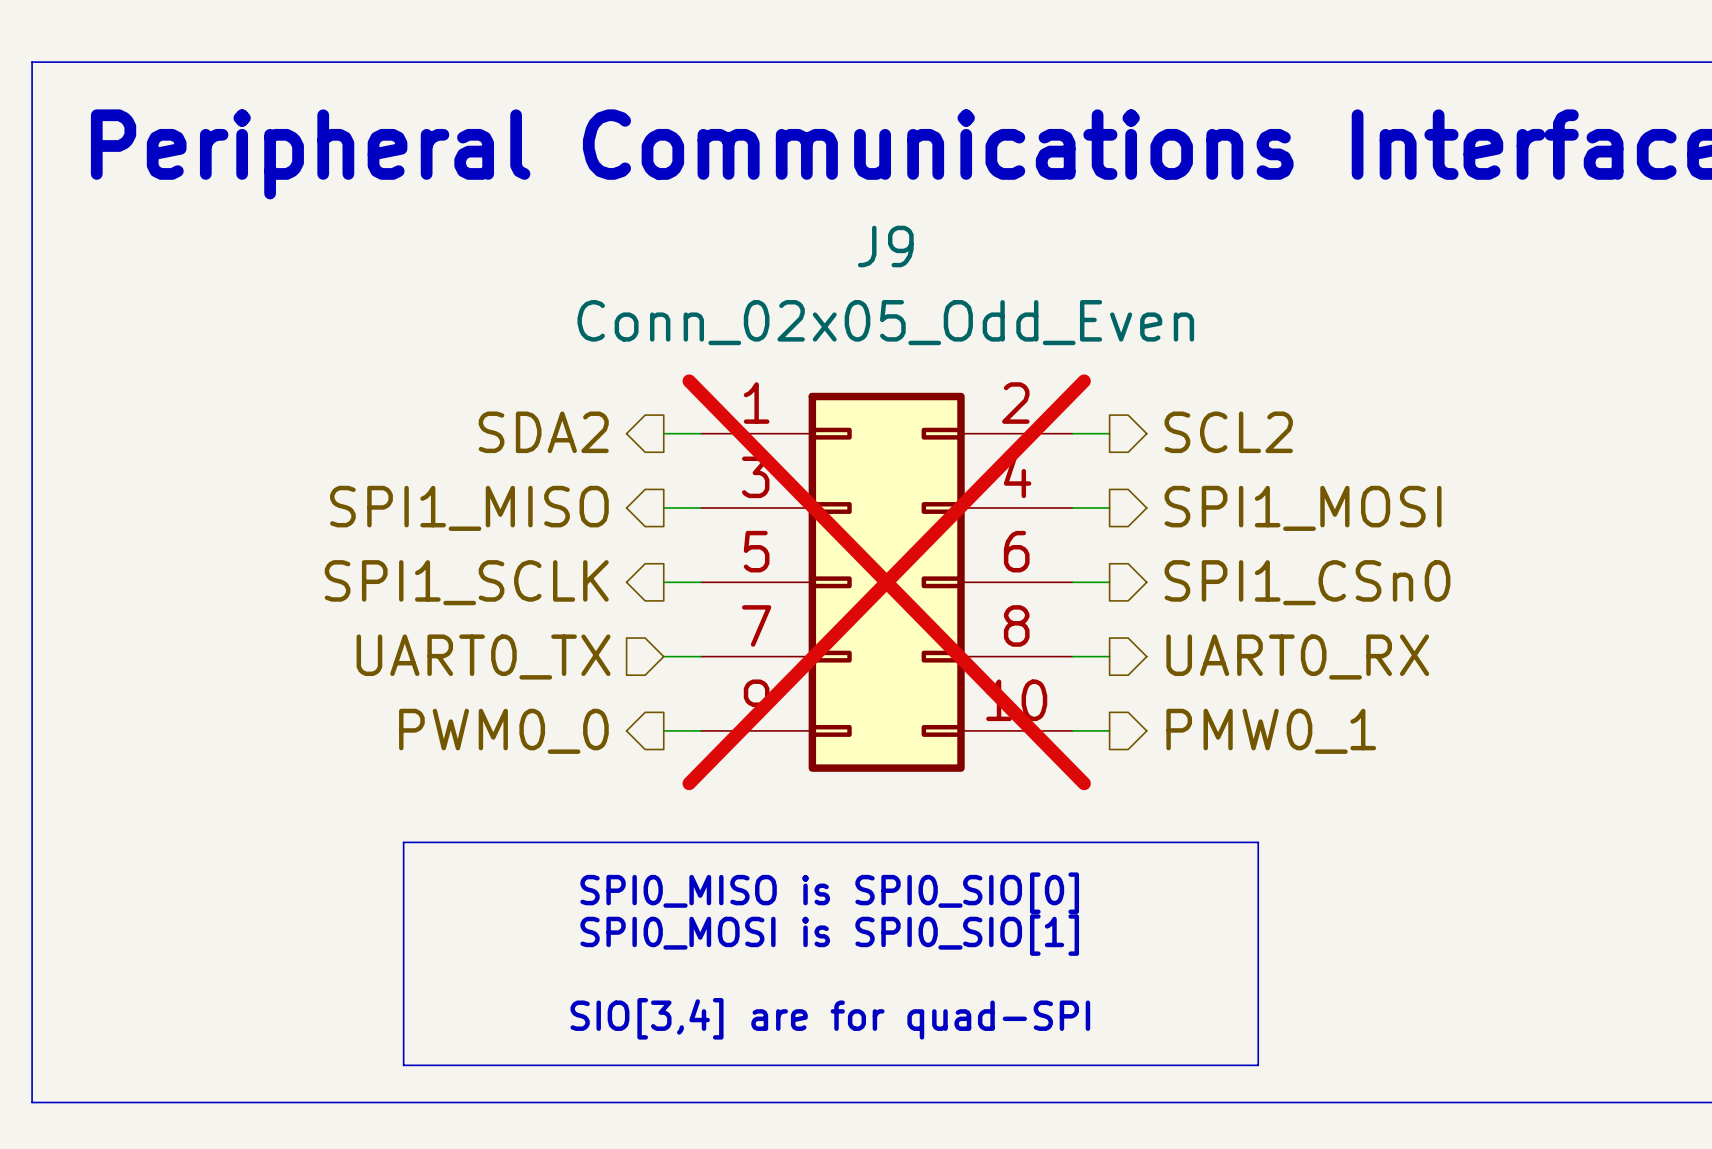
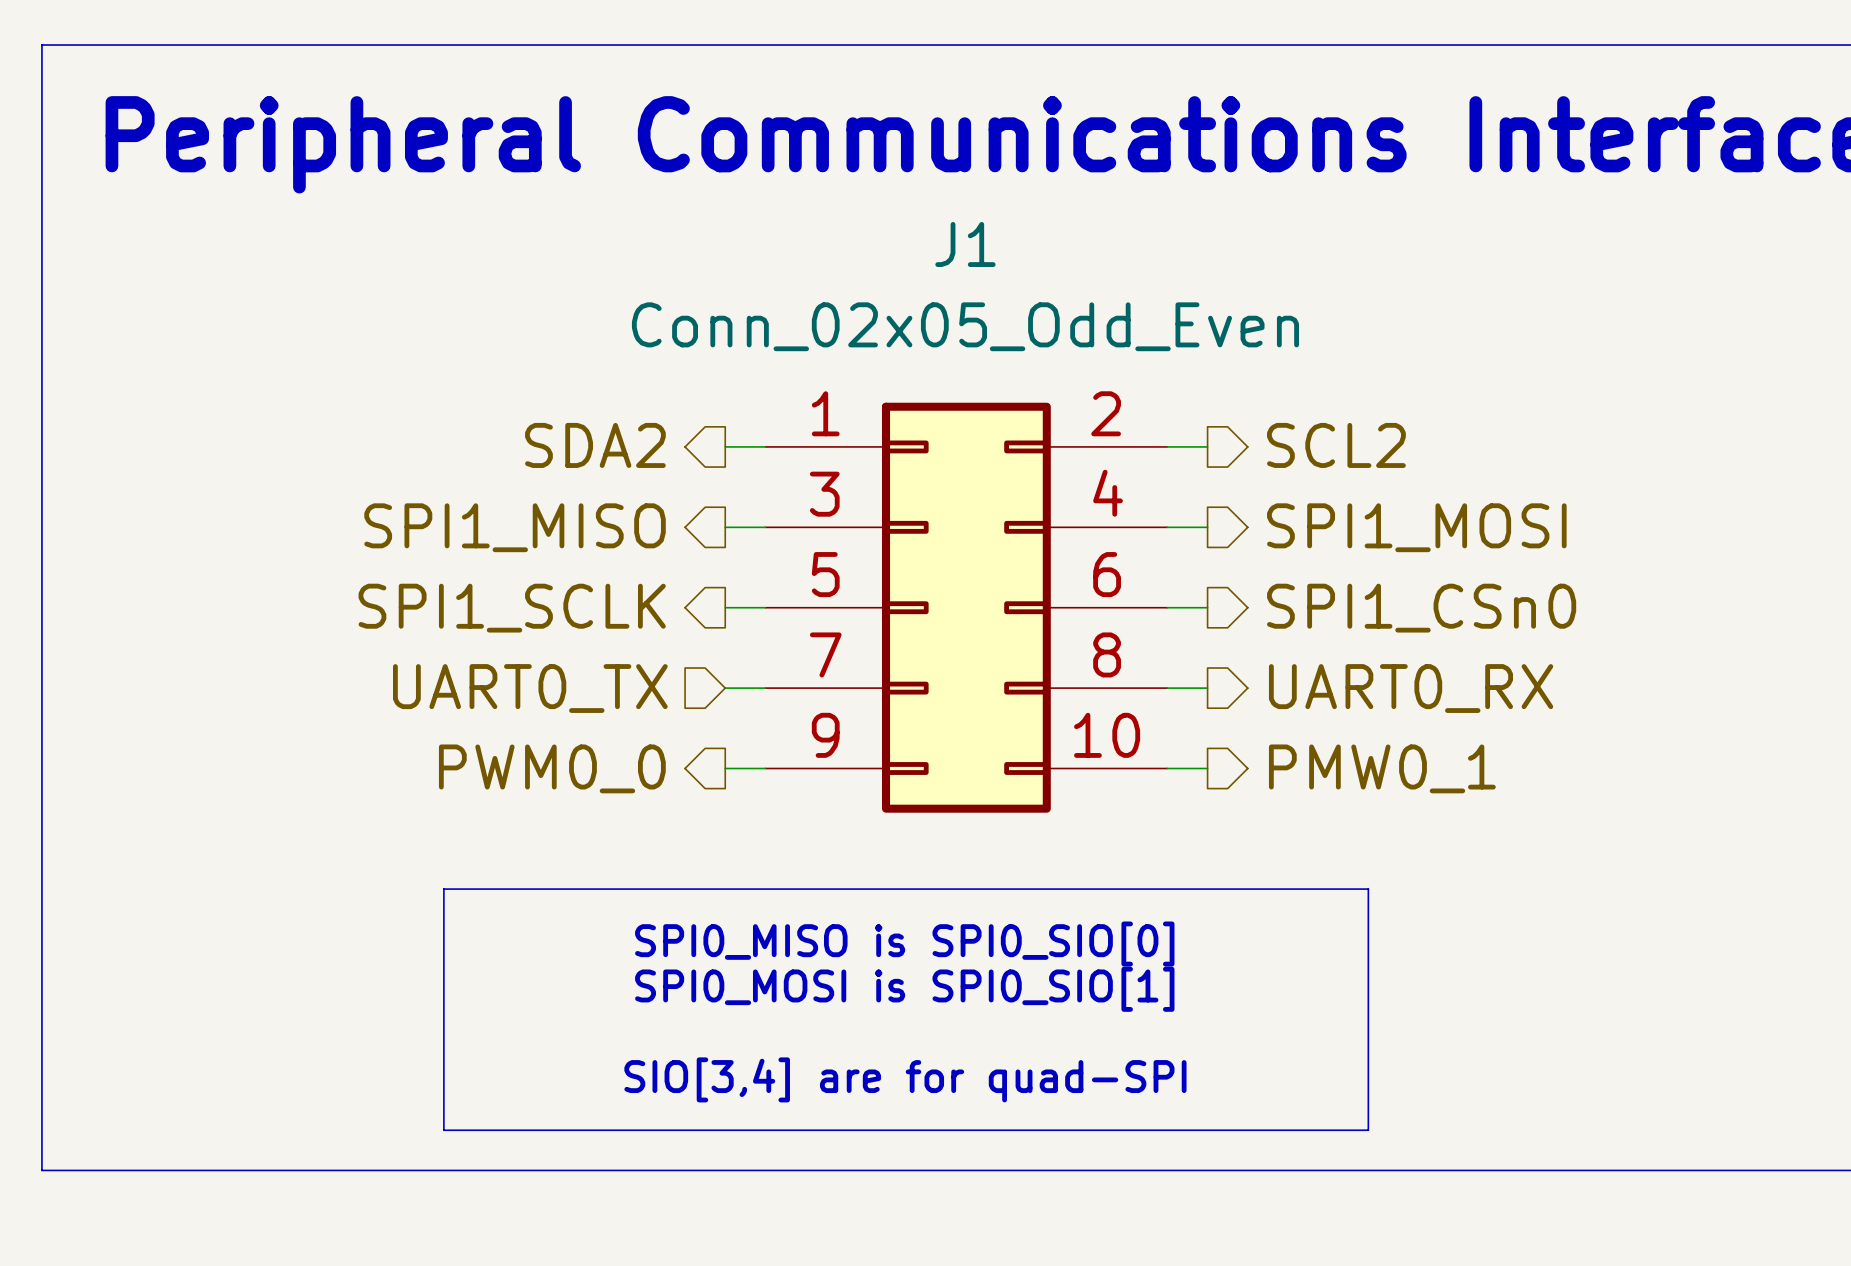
J9 name: J9 (885, 246) -> J1 (965, 244)
J9 do-not-place cross: (886, 582) -> none

